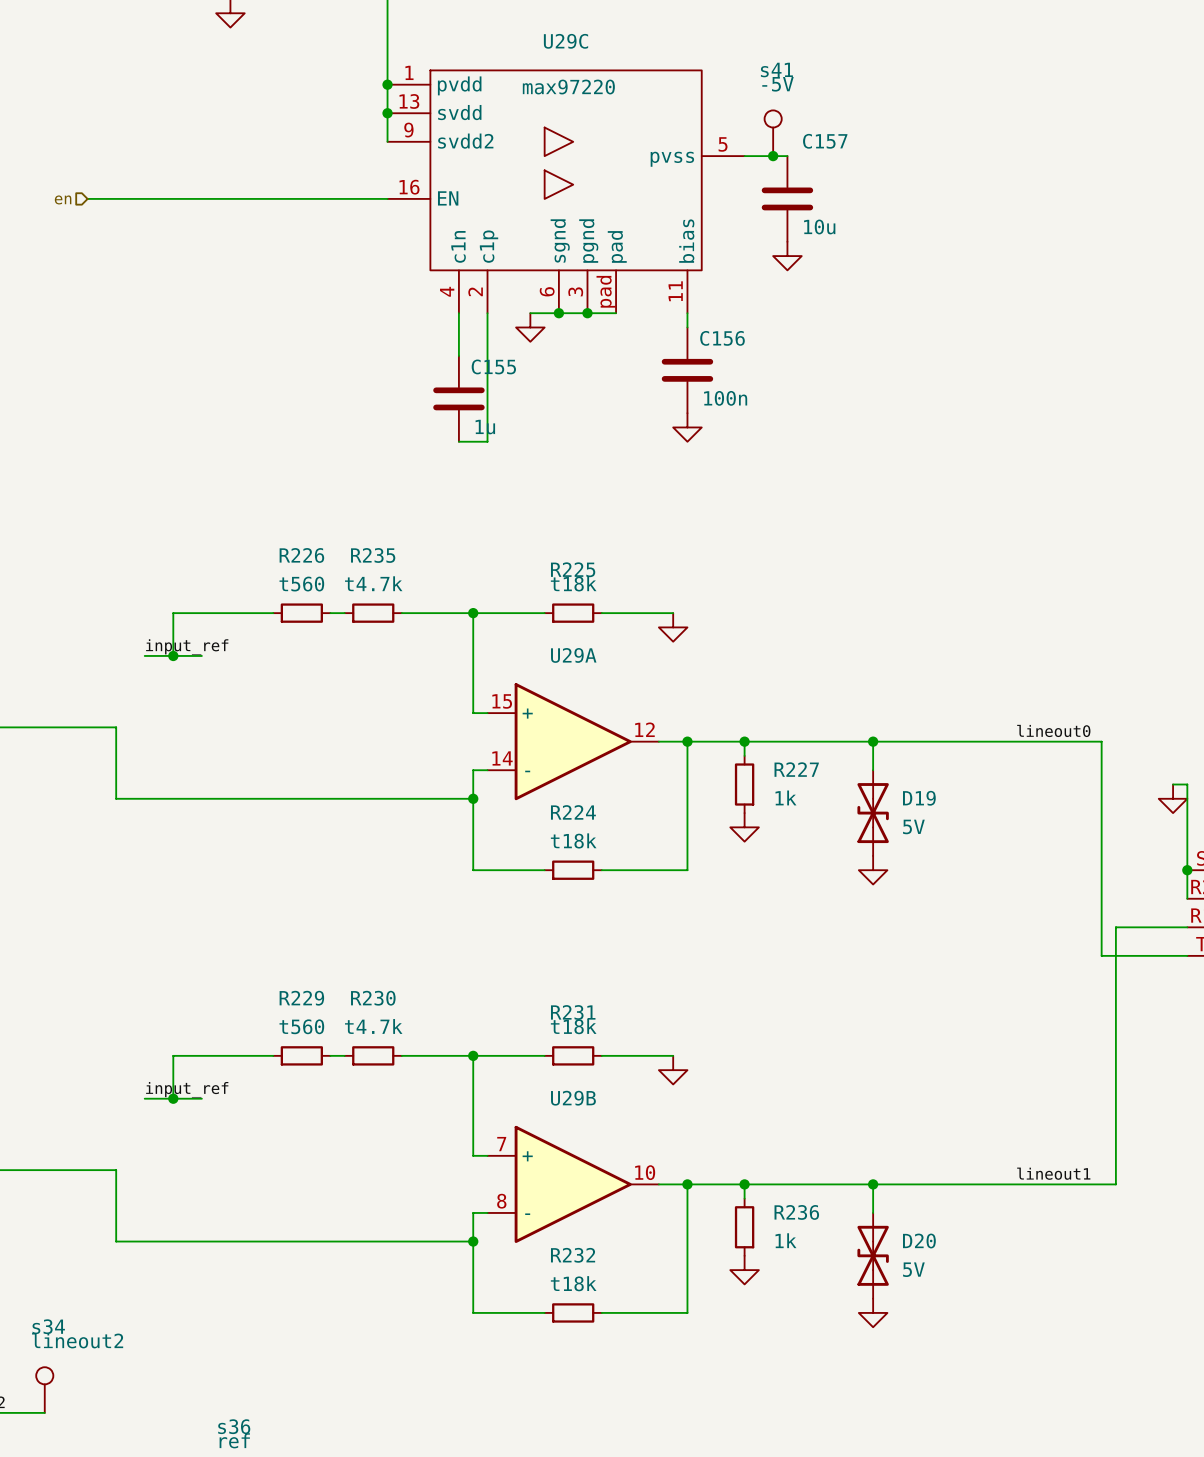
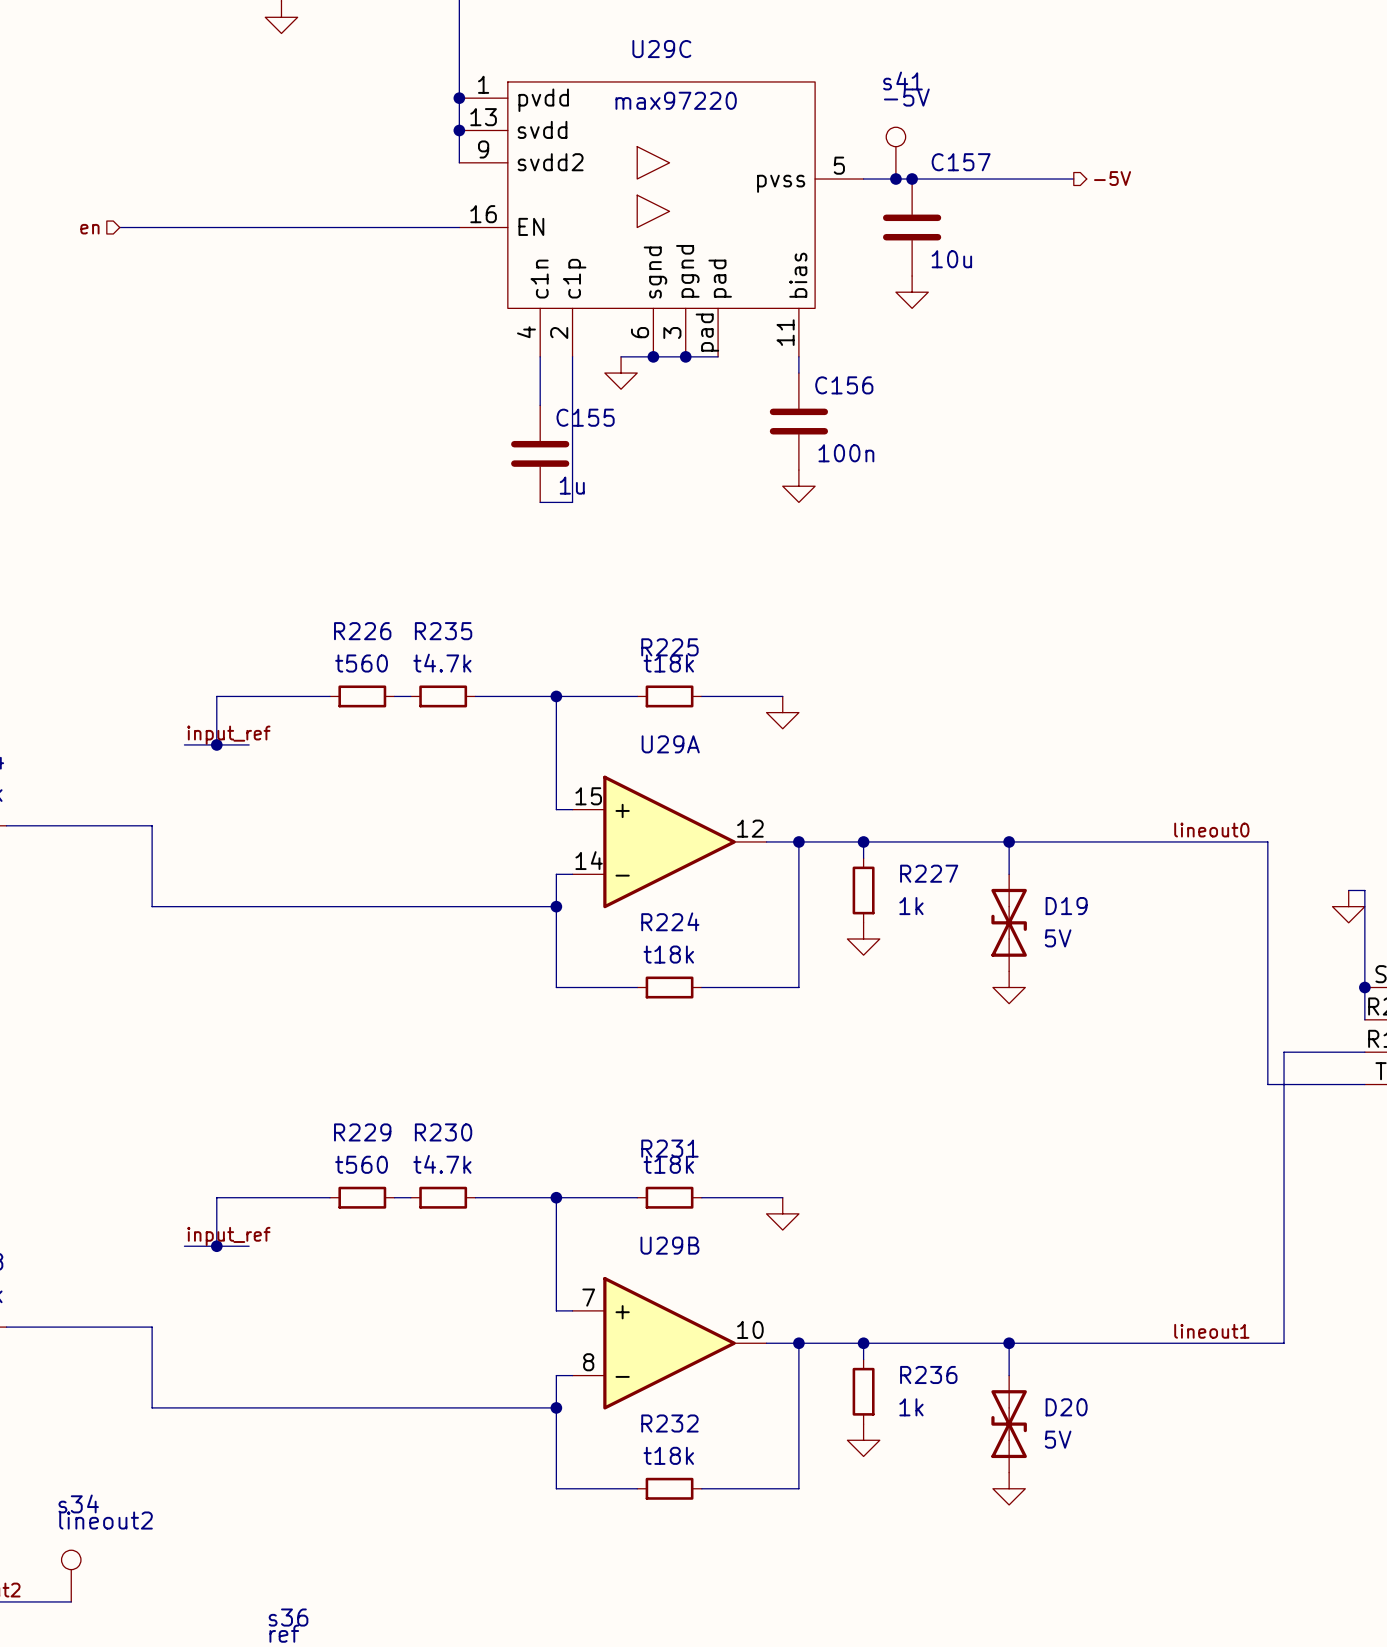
hierarchical label: none -> -5V (1112, 178)
wire: none -> (912, 179) (1073, 179)
junction: none -> (912, 179)

